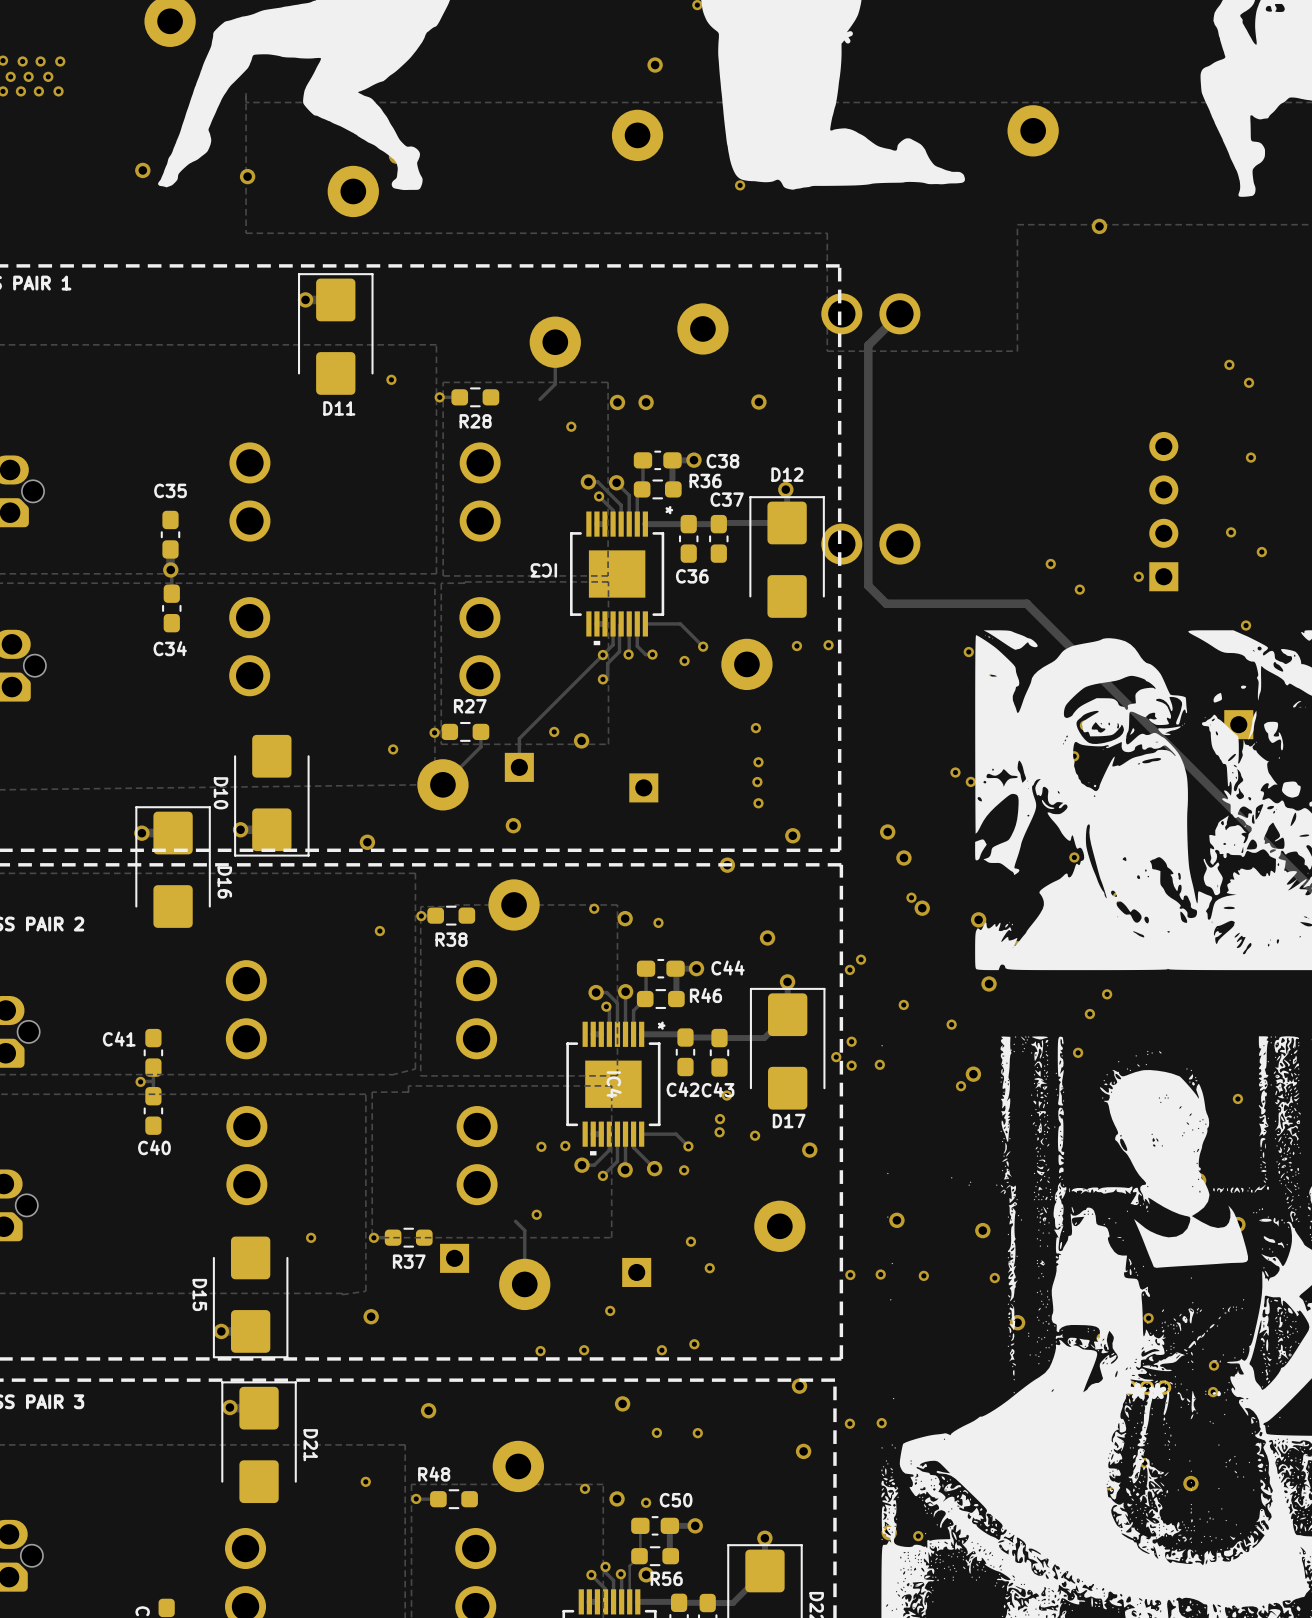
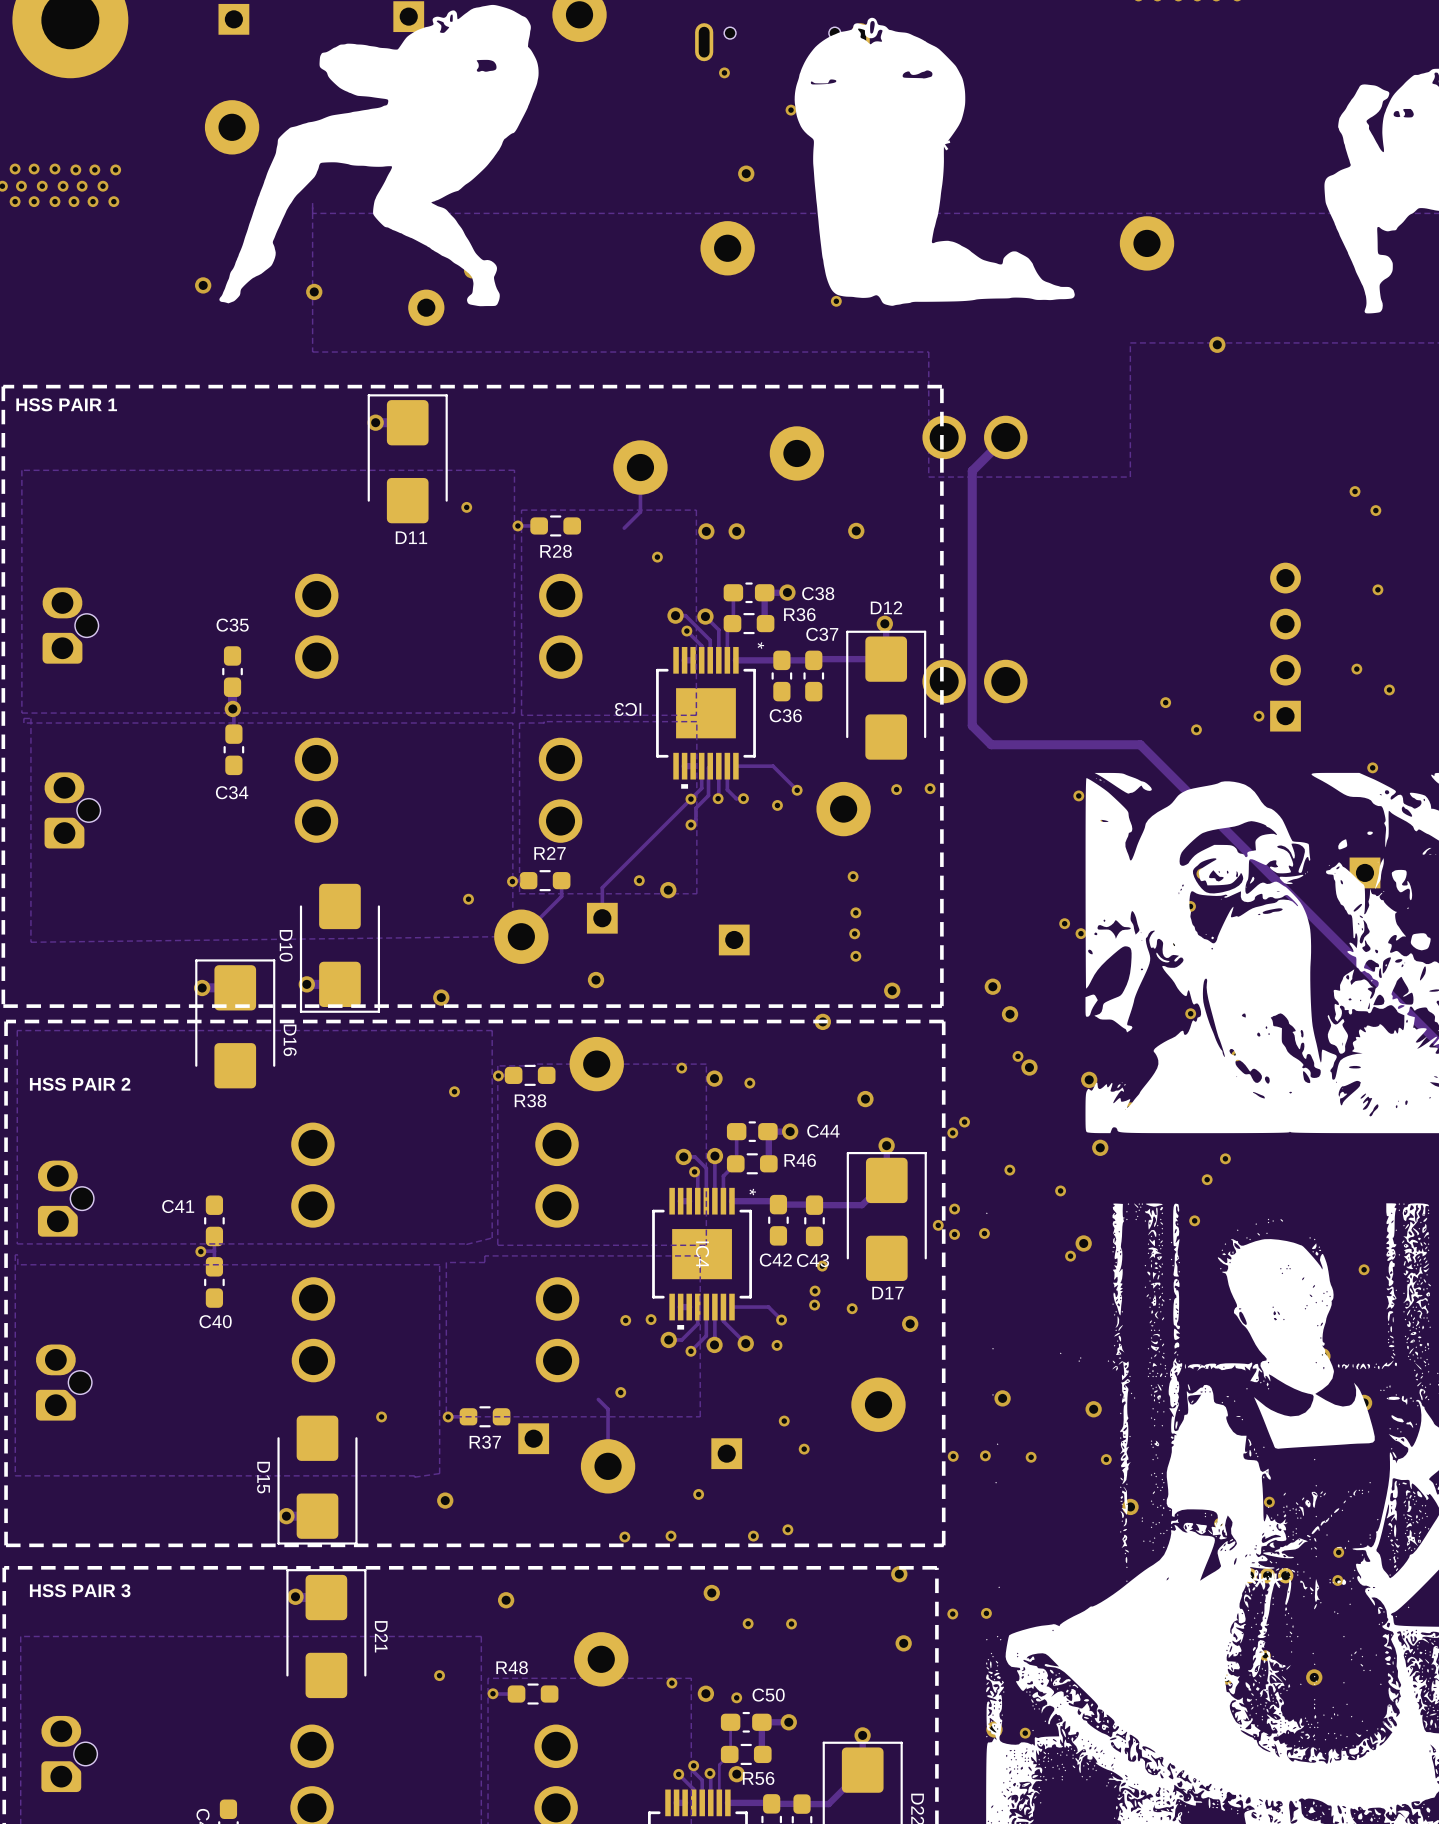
part footprint: [327, 165, 379, 218] -> [408, 289, 445, 326]

